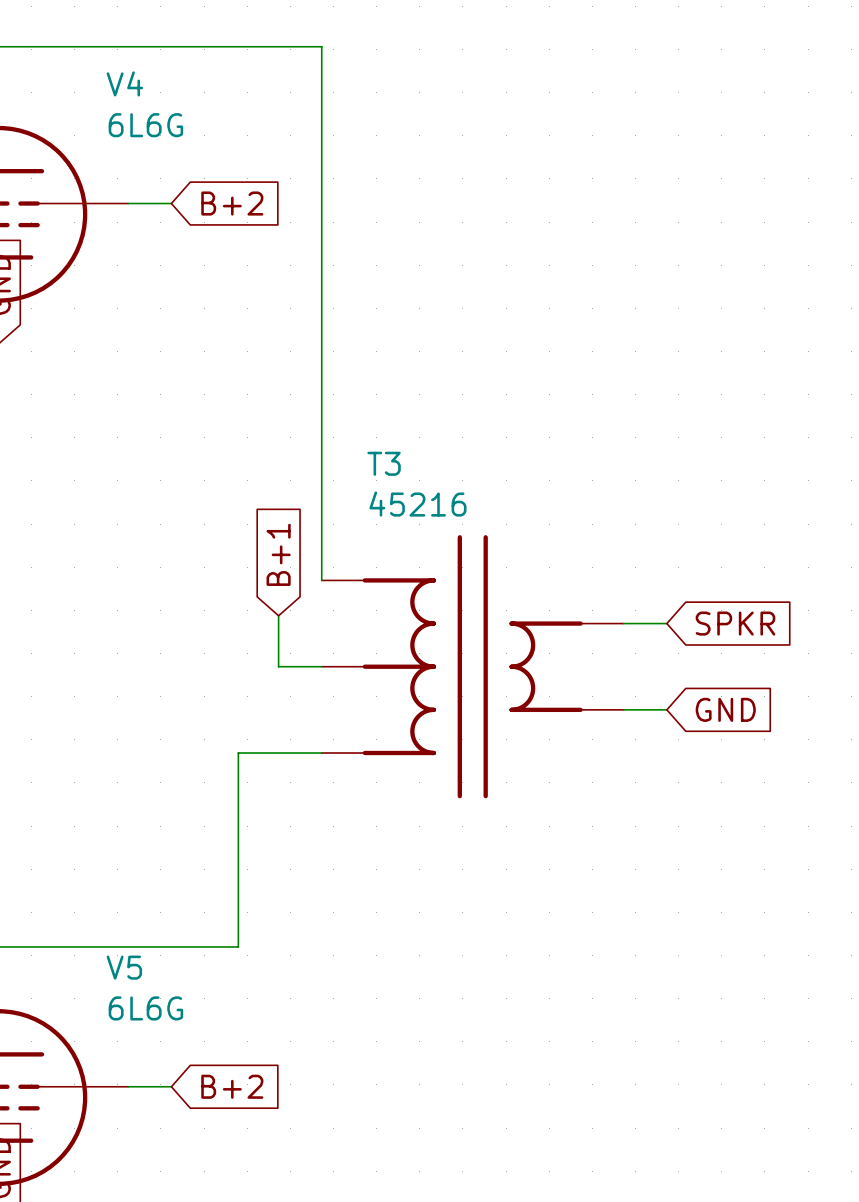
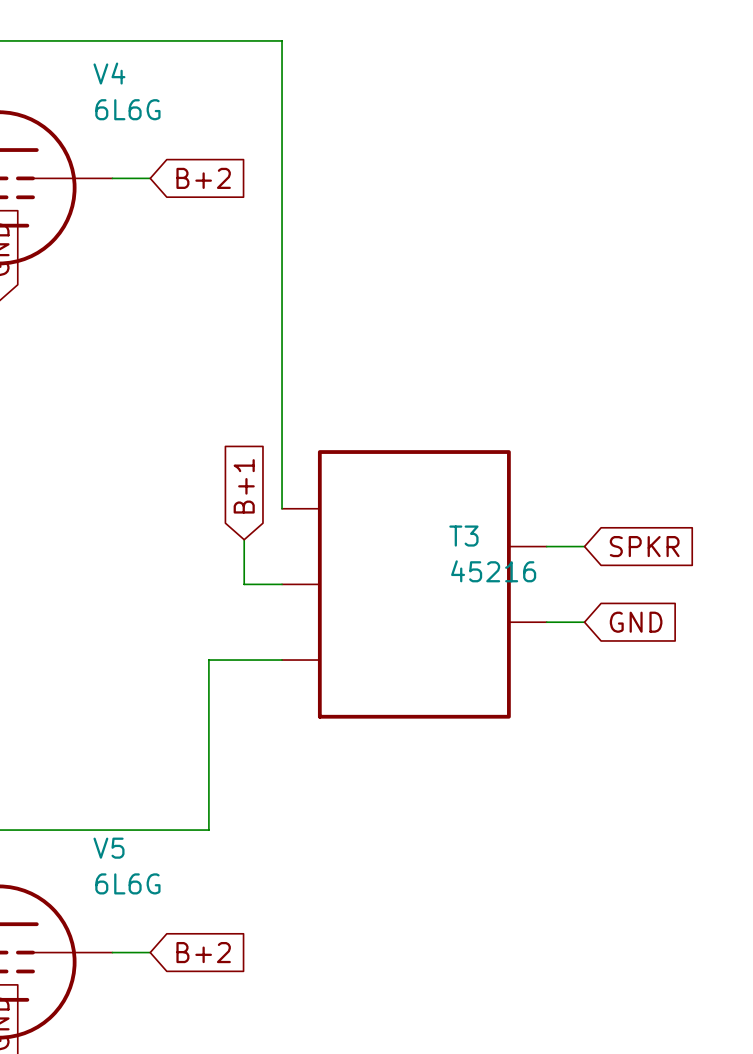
T3 name position: T3 (384, 463) -> T3 (463, 536)
T3 value position: 45216 (417, 504) -> 45216 (493, 571)
T3 symbol: [321, 535, 624, 799] -> [282, 450, 547, 719]

